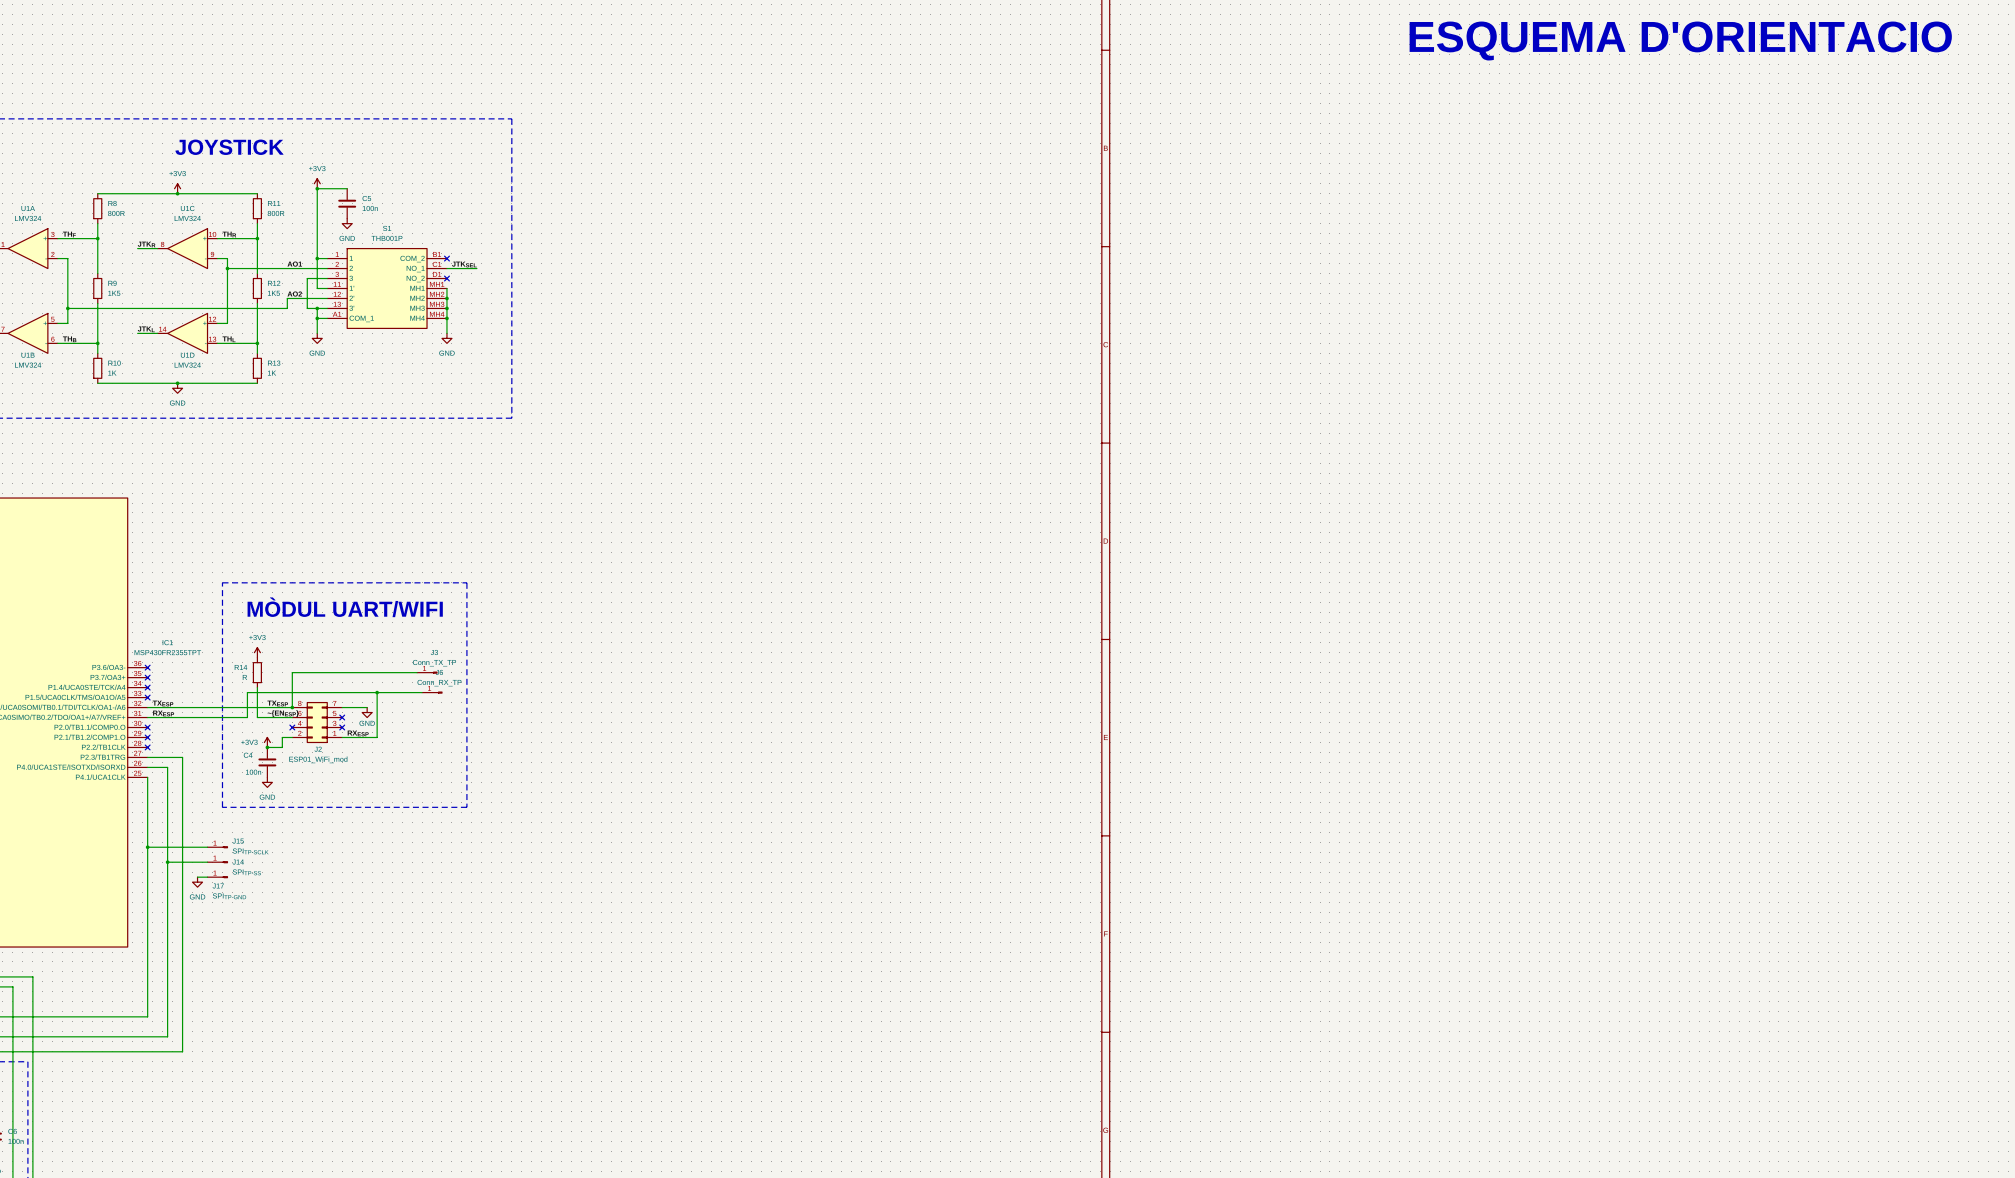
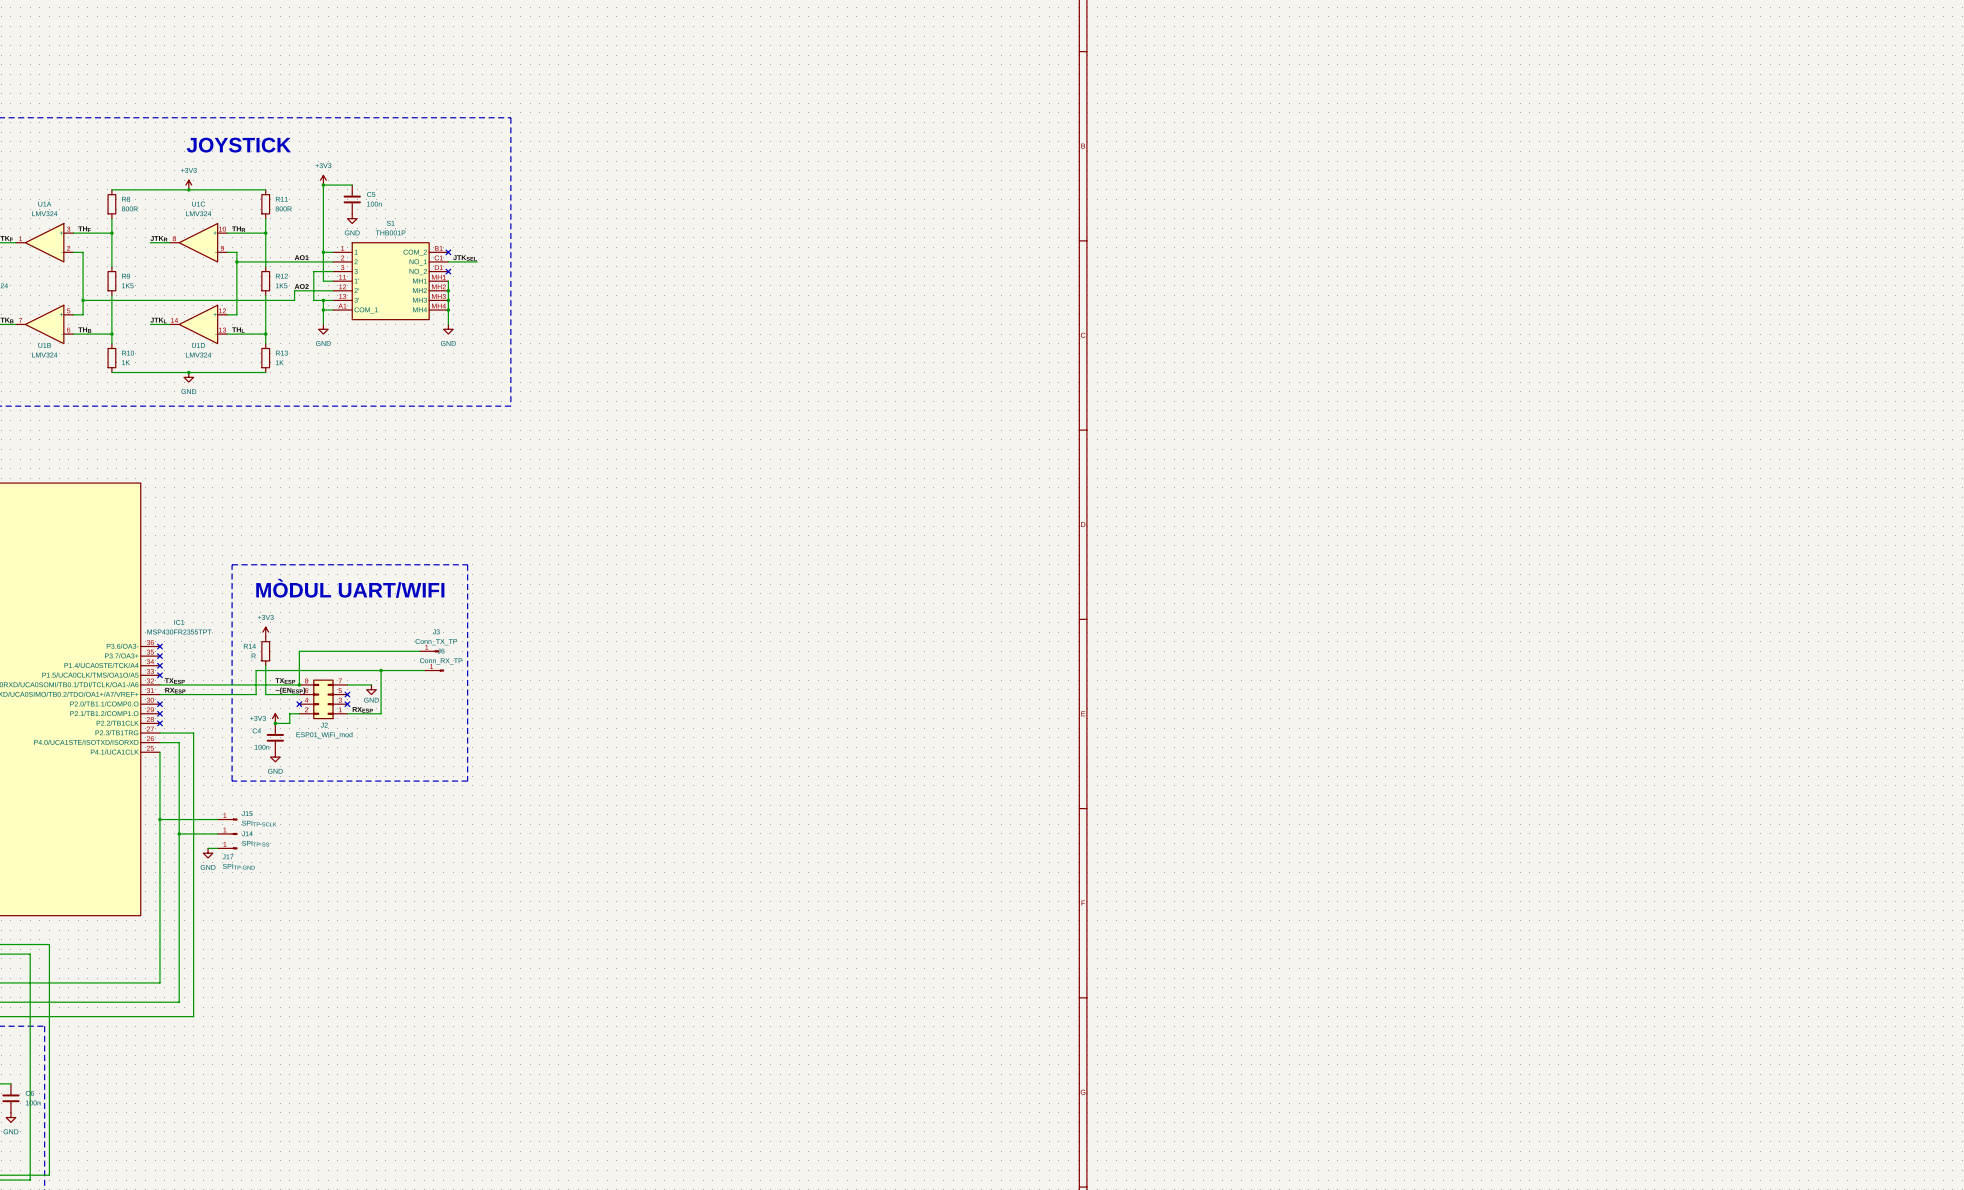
text: ESQUEMA D'ORIENTACIO (1680, 41) -> none

